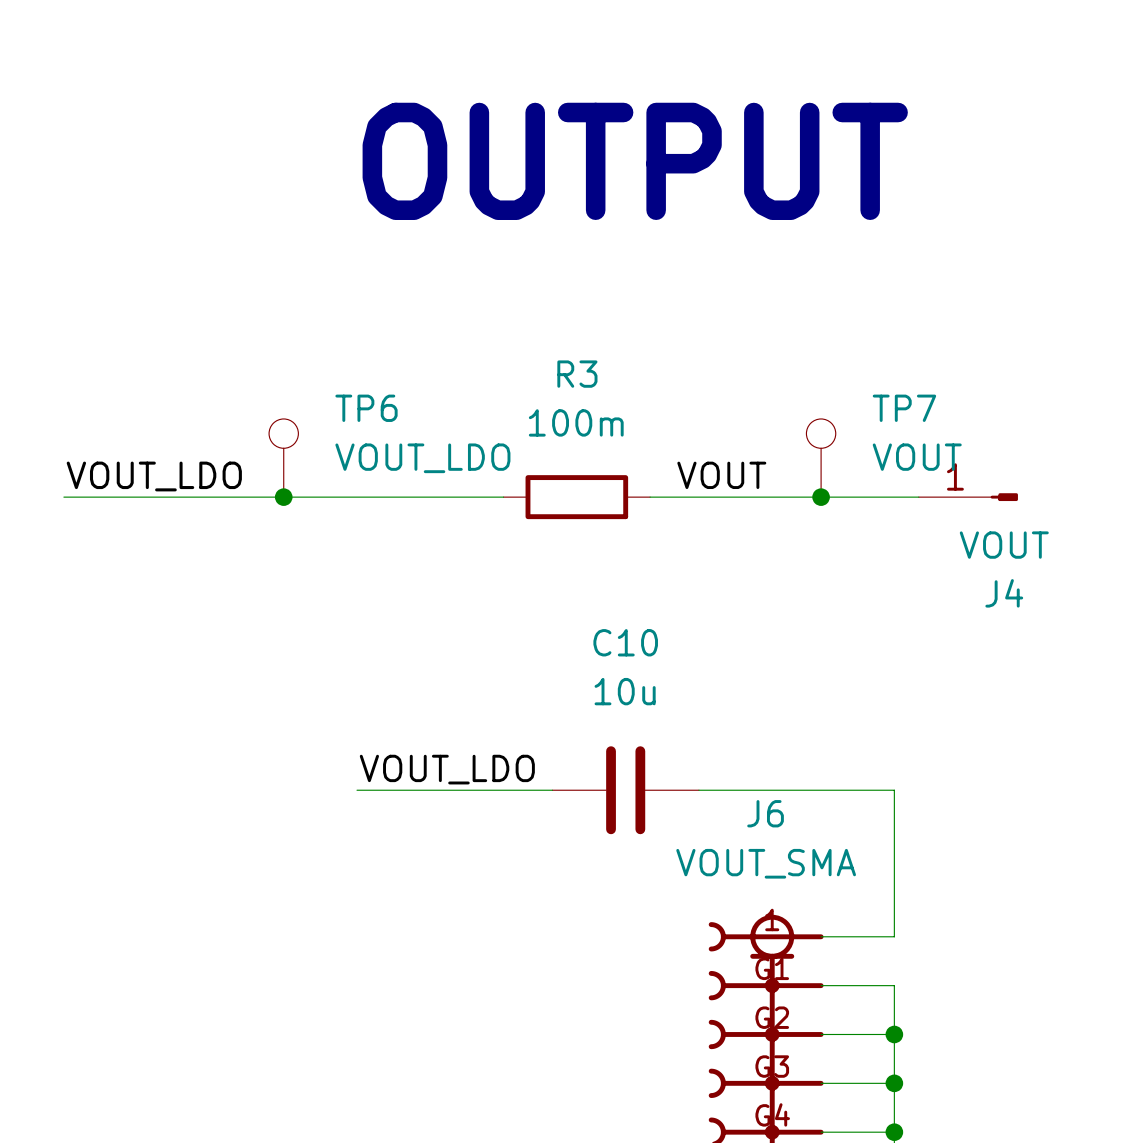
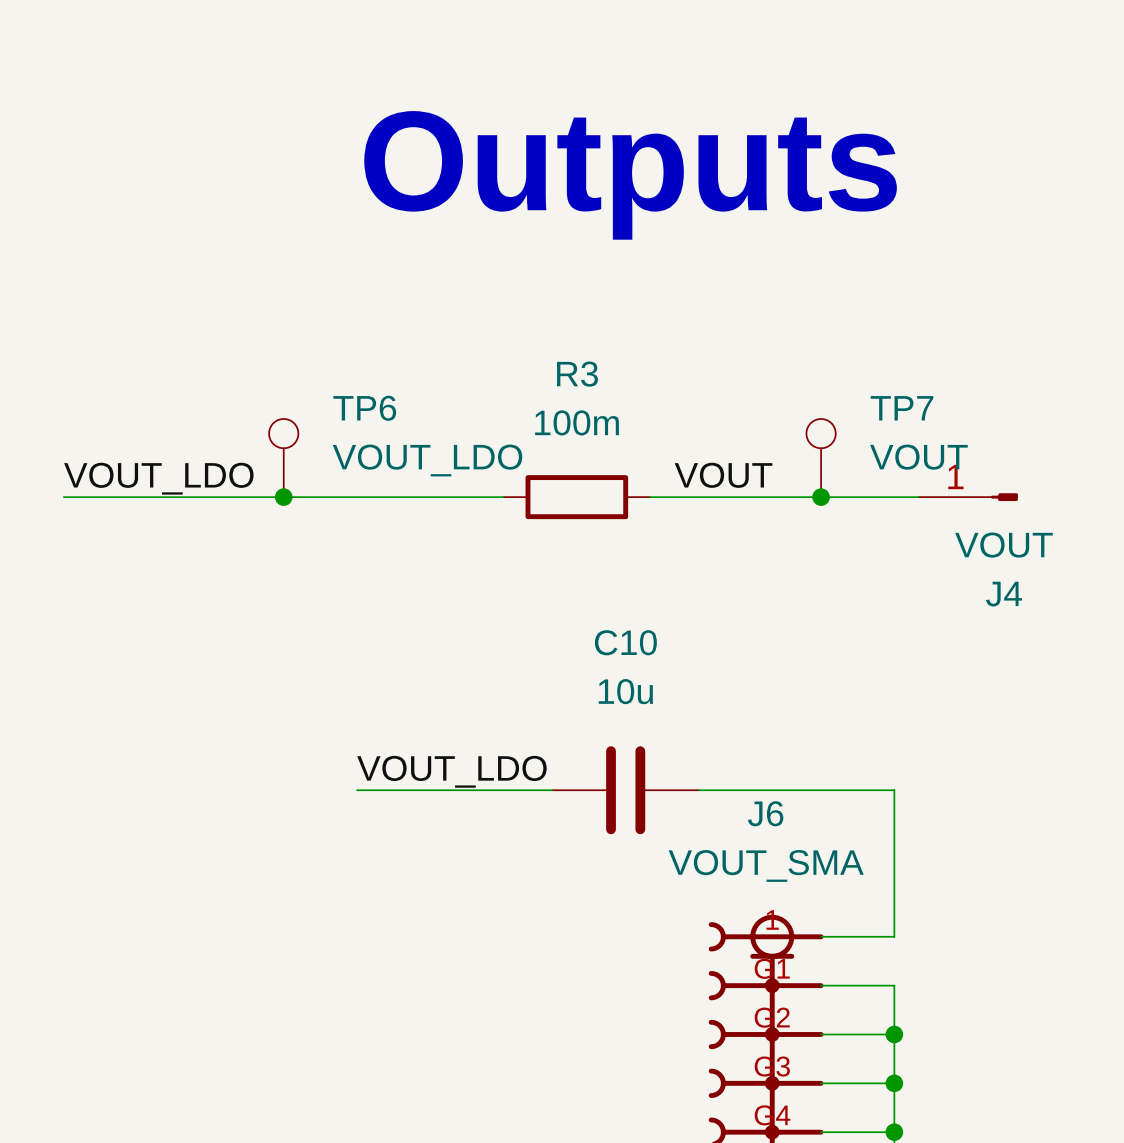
text: OUTPUT (635, 161) -> Outputs (630, 175)

